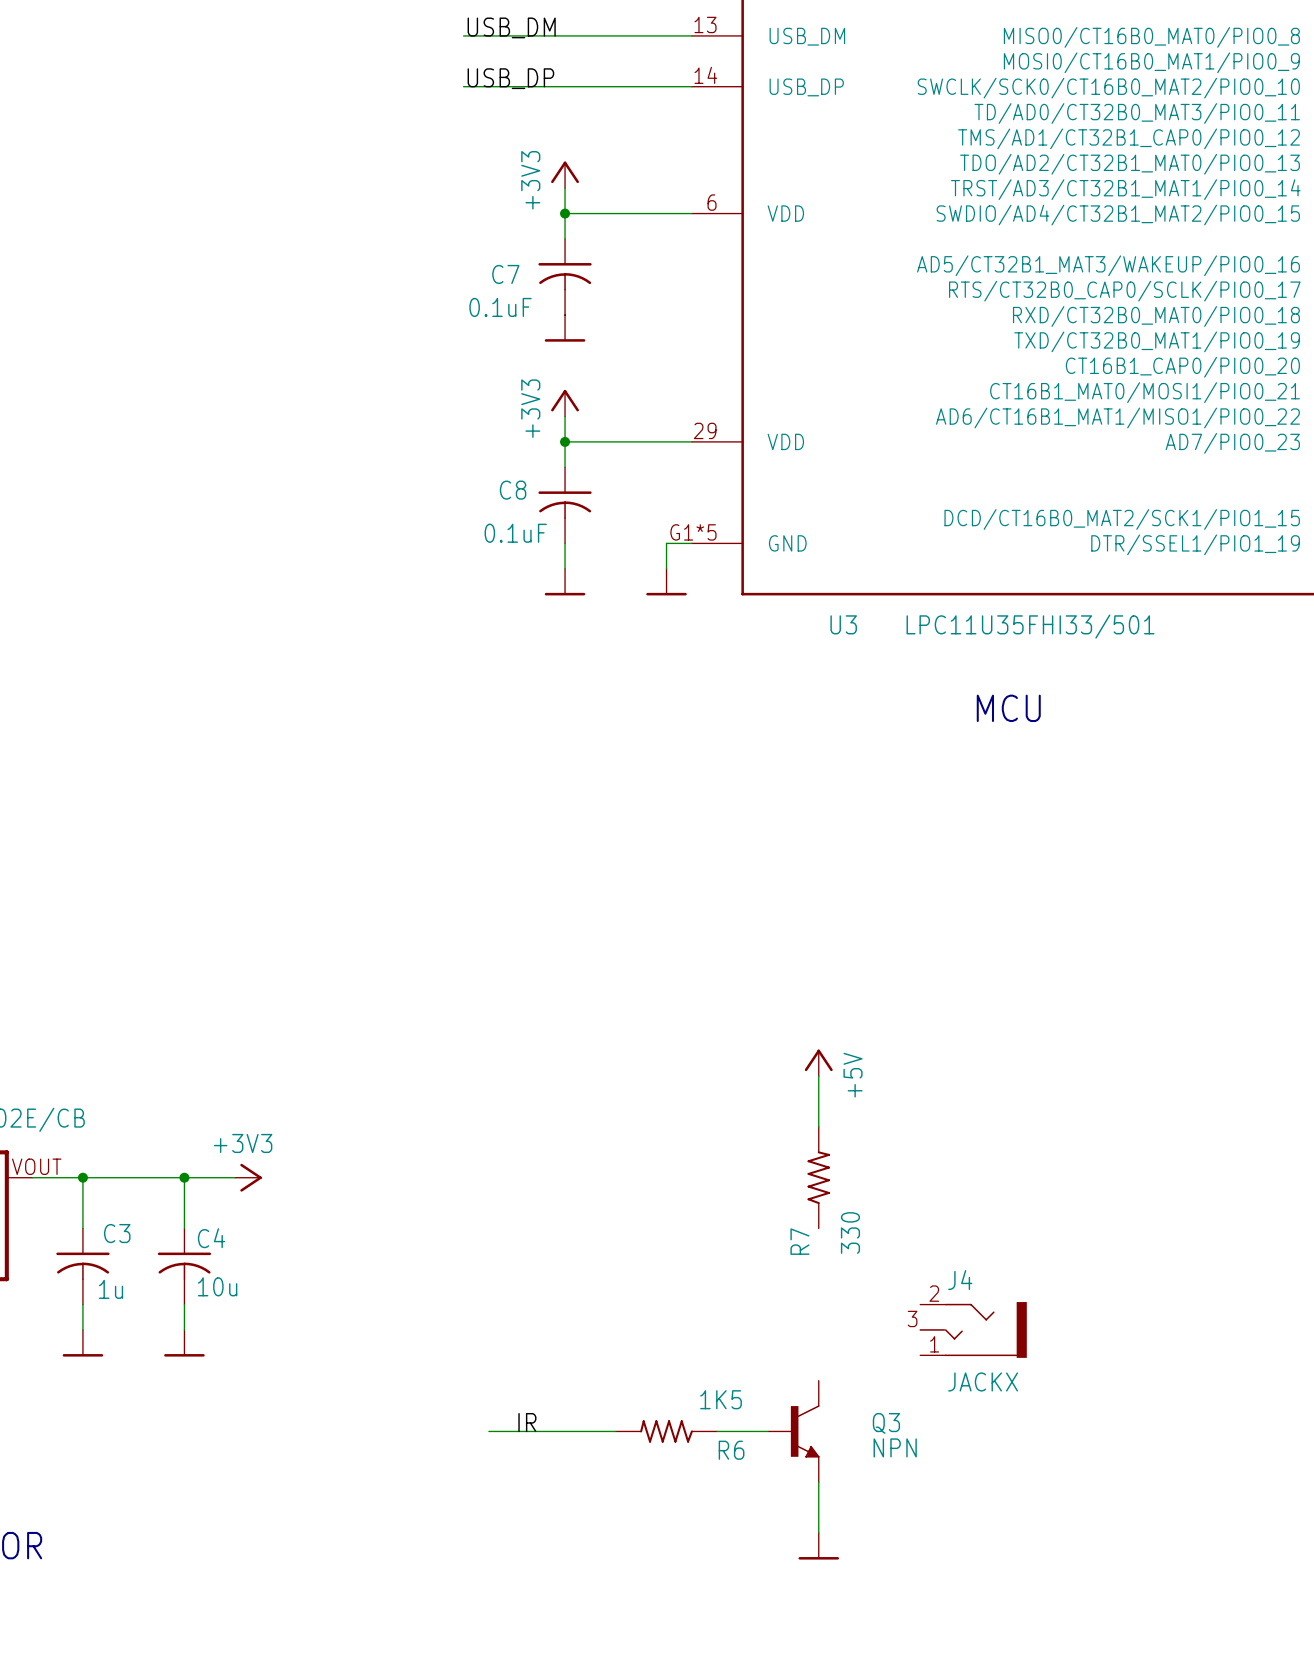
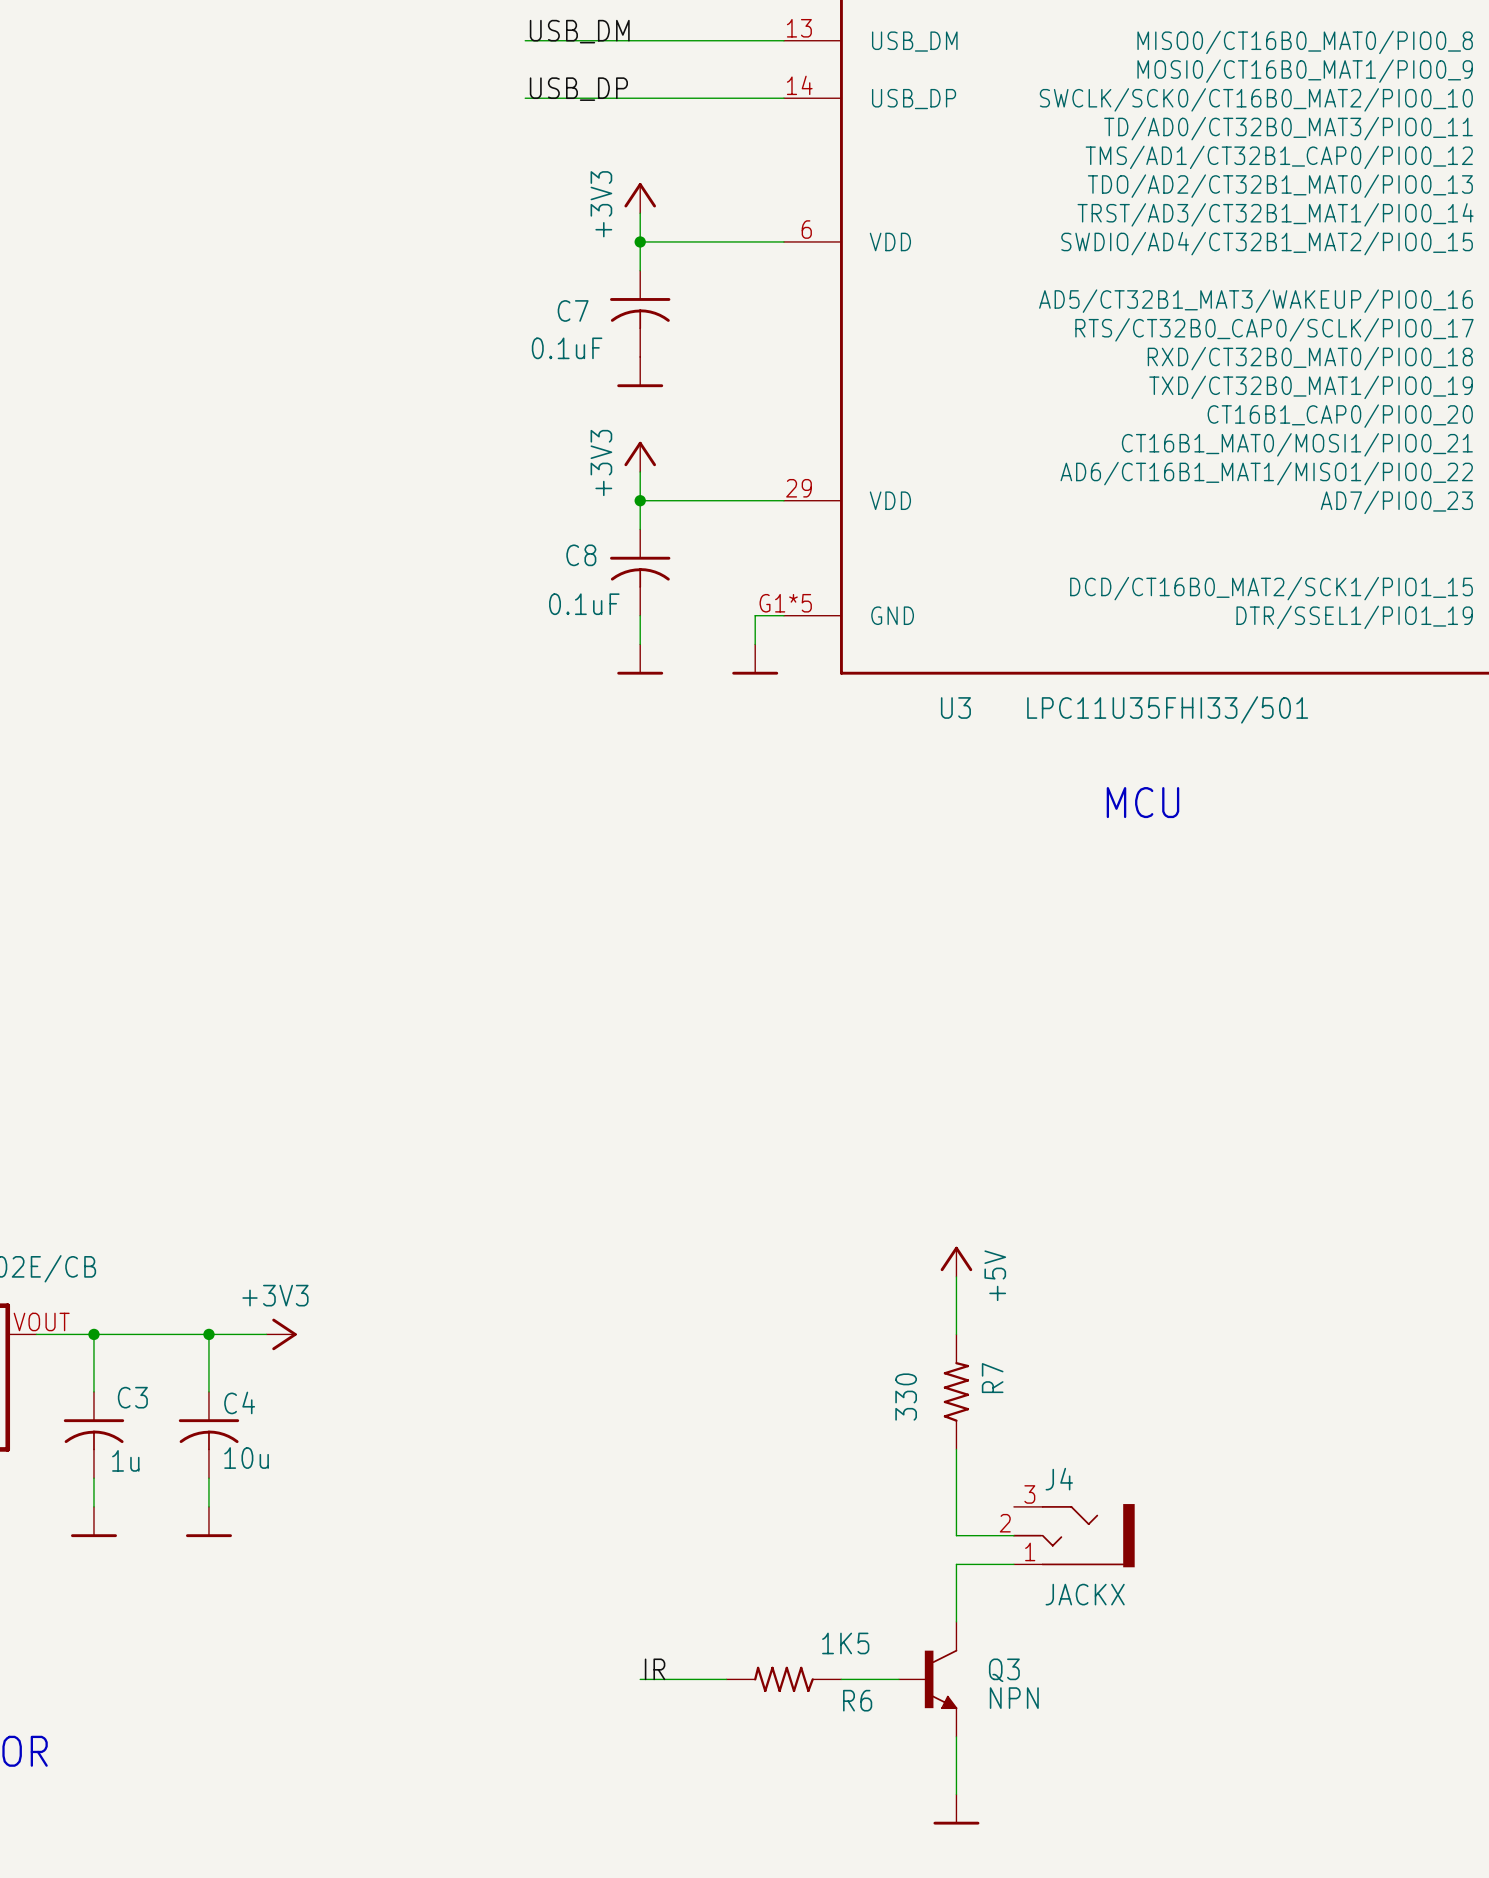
power symbol position: +5V (818, 1062) -> +5V (956, 1261)
wire: (818, 1076) (818, 1126) -> (956, 1276) (956, 1334)
R7 position: (818, 1177) -> (956, 1391)
R7 value position: 330 (850, 1232) -> 330 (906, 1397)
R7 name position: R7 (799, 1241) -> R7 (992, 1378)
wire: none -> (956, 1449) (956, 1535) (1013, 1535)
J4 pin number: 2 (934, 1293) -> 3 (1029, 1494)
J4 pin number: 3 (912, 1318) -> 2 (1005, 1523)
J4 position: (973, 1329) -> (1073, 1535)
wire: none -> (1013, 1564) (956, 1564) (956, 1621)
label position: IR (527, 1422) -> IR (655, 1669)
Q3 name position: Q3 (886, 1423) -> Q3 (1004, 1670)
wire: (488, 1431) (615, 1431) -> none
R6 position: (666, 1431) -> (783, 1679)
wire: (717, 1431) (768, 1431) -> (841, 1679) (898, 1679)
Q3 position: (793, 1431) -> (928, 1679)
Q3 value position: NPN (895, 1447) -> NPN (1014, 1698)
wire: none -> (640, 1679) (726, 1679)
wire: (818, 1482) (818, 1532) -> (956, 1736) (956, 1794)
power symbol position: (818, 1546) -> (956, 1809)

